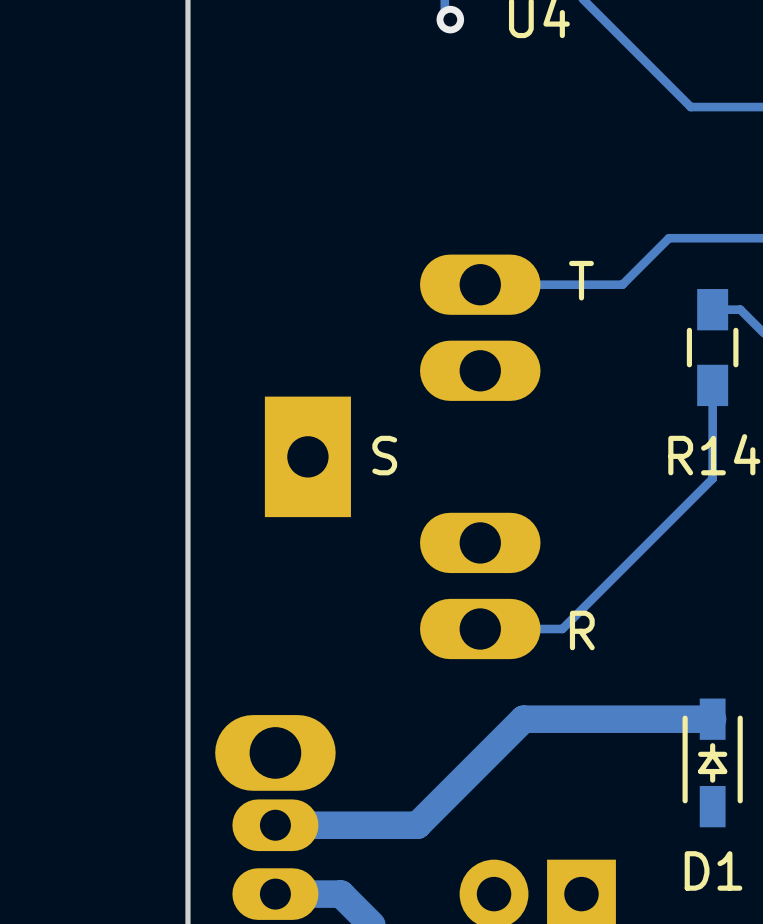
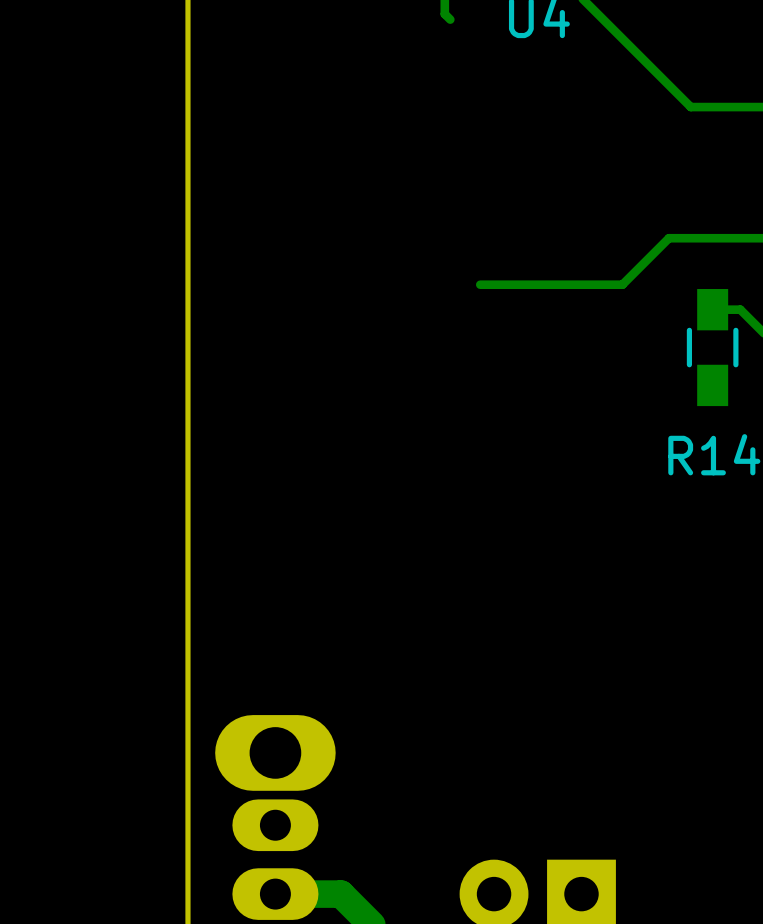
via: (450, 19) -> none
text: T (581, 280) -> none
track: (712, 385) (712, 478) (562, 628) (480, 628) -> none
text: S (384, 455) -> none
part: (402, 456) -> none
text: R (582, 630) -> none
track: (712, 719) (523, 719) (417, 825) (275, 825) -> none
D1: (712, 762) -> none

